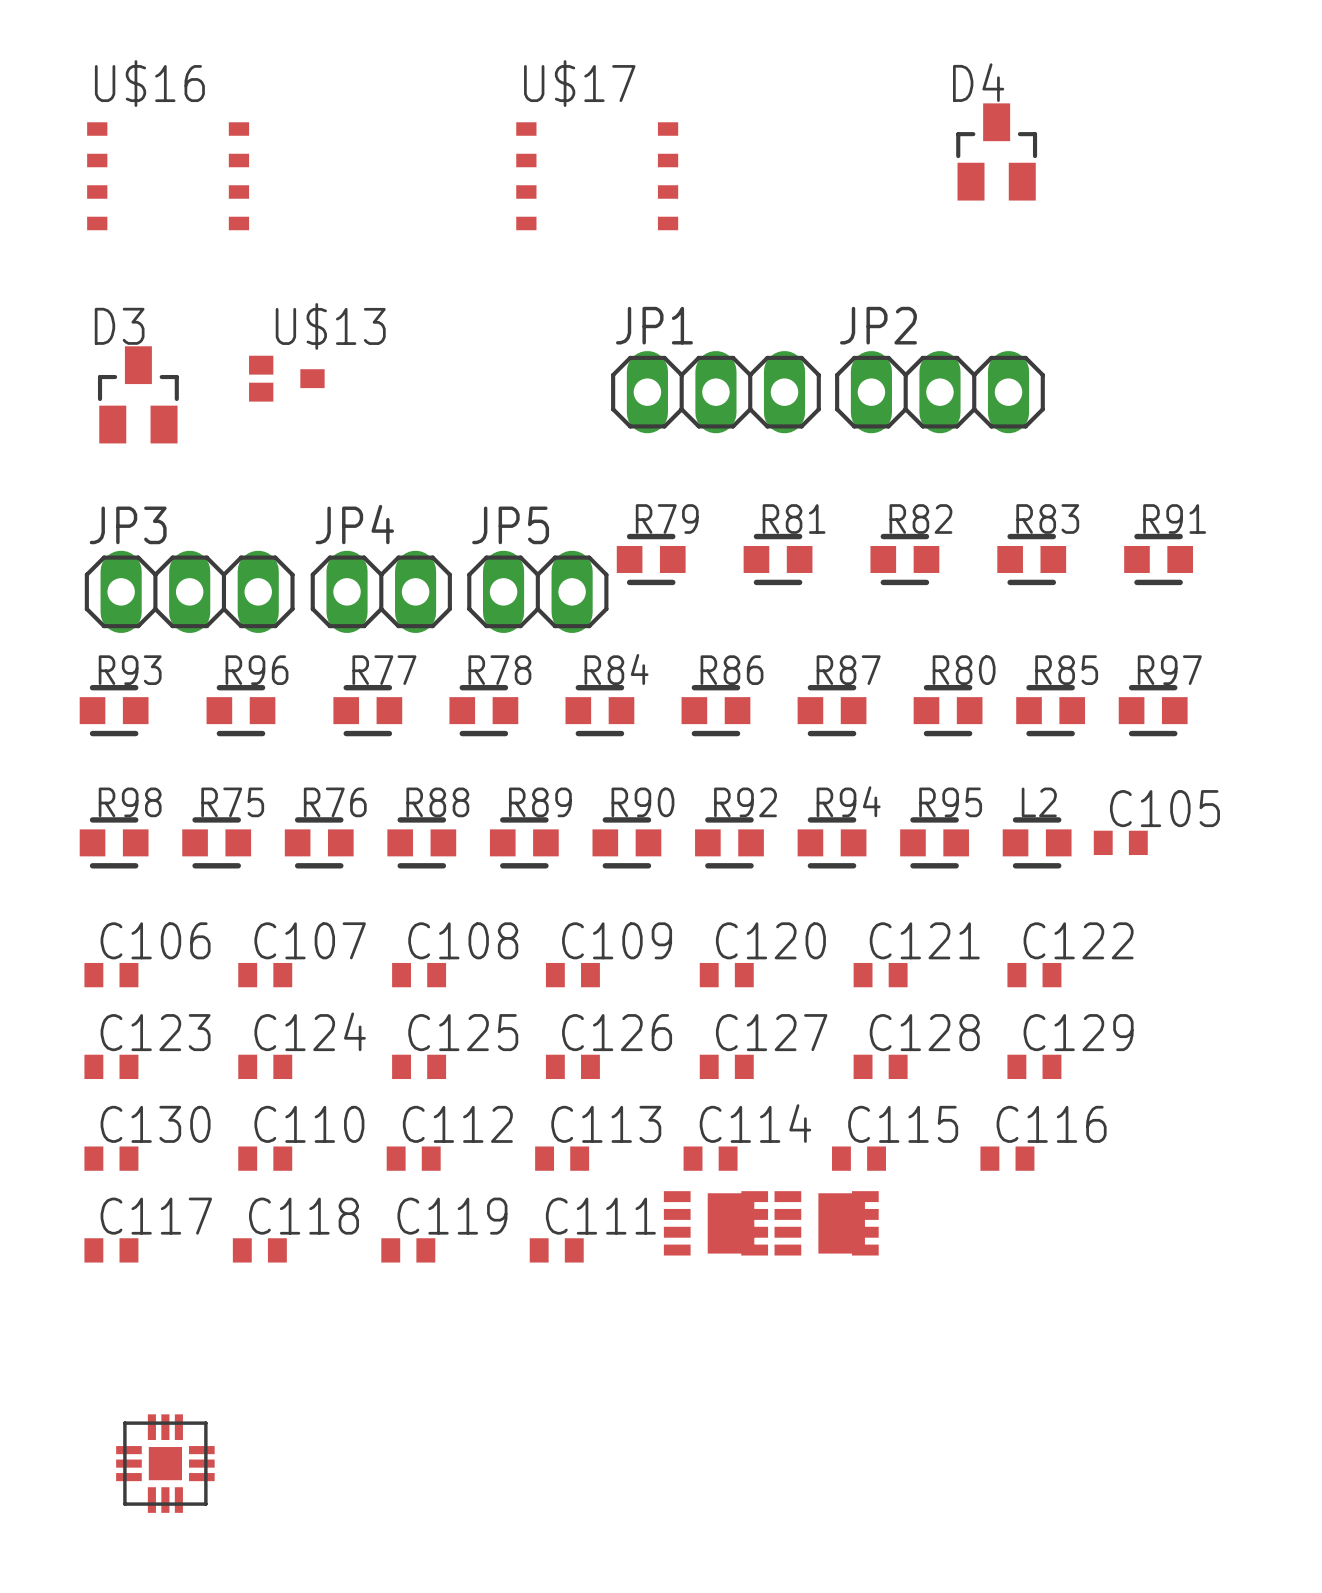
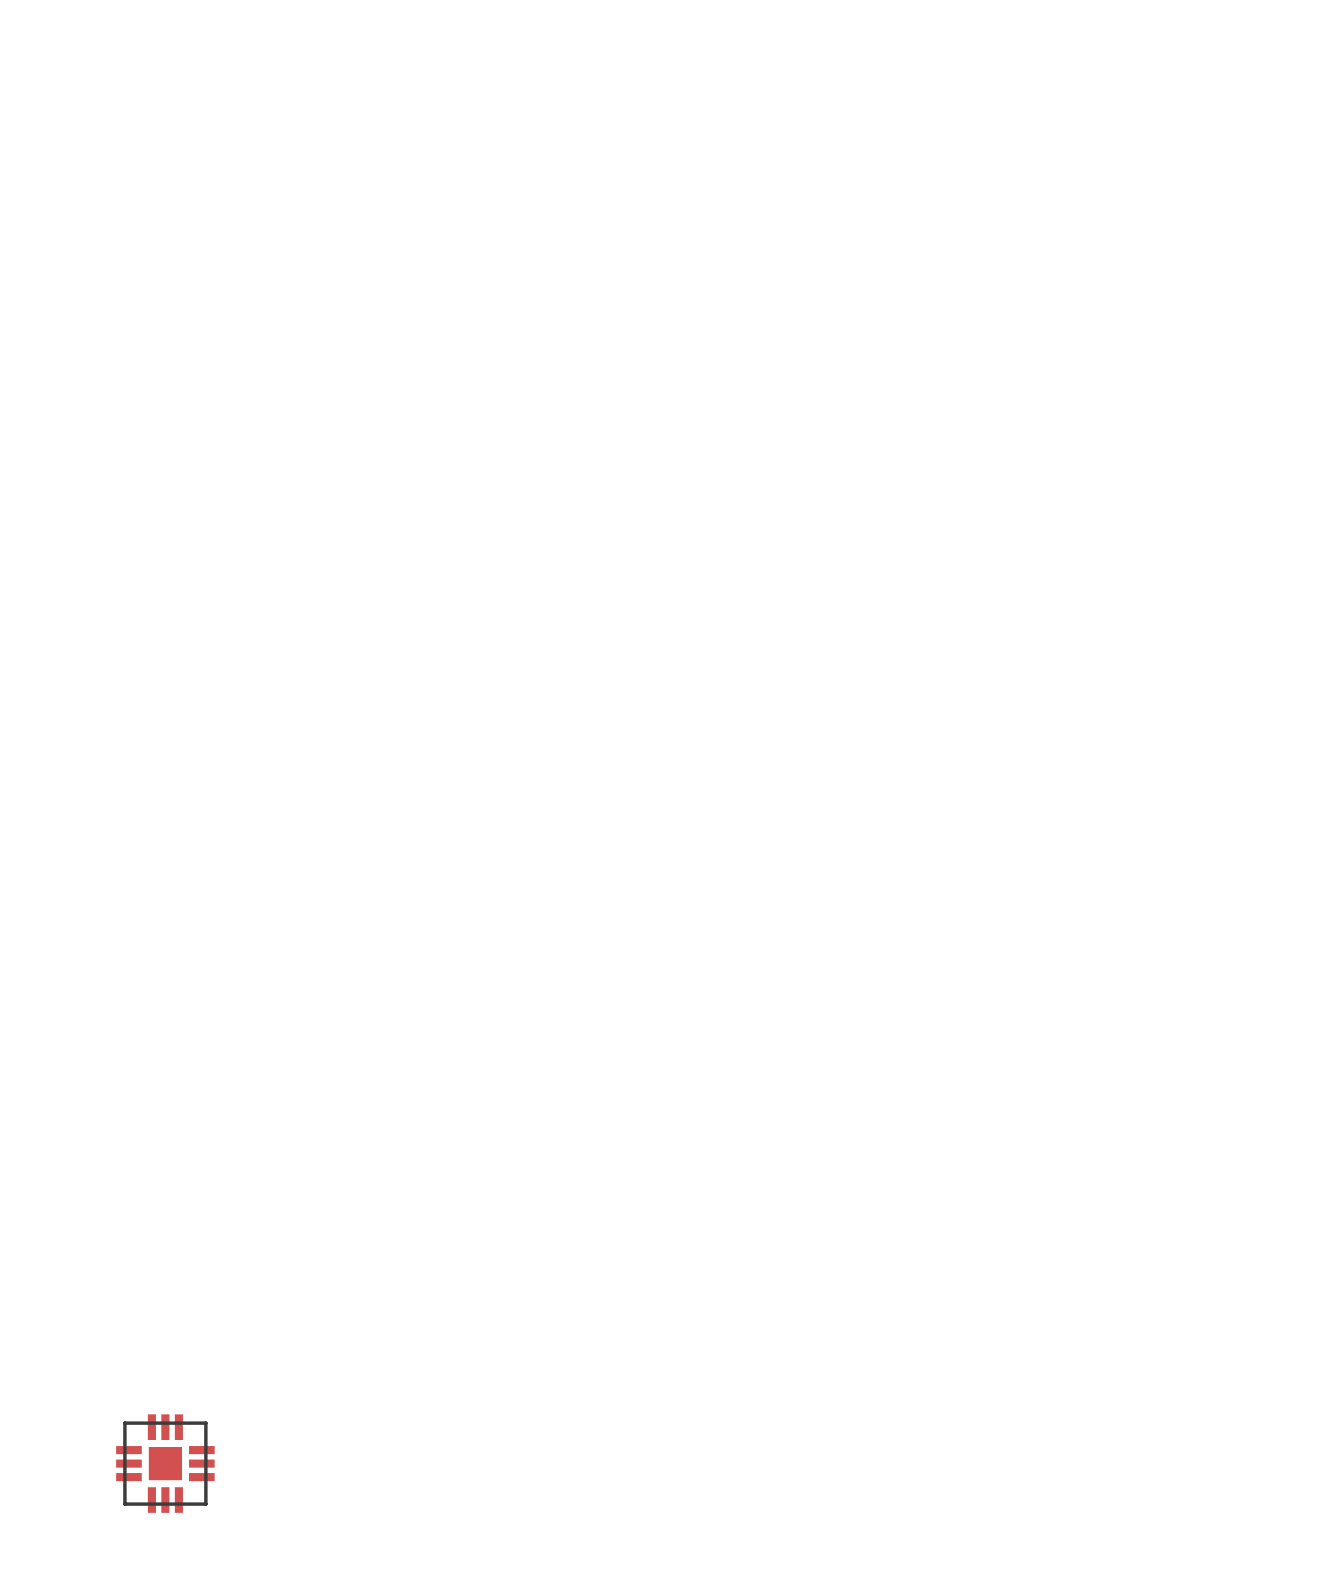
D4: (996, 151) -> none
U$16: (168, 176) -> none
U$17: (597, 176) -> none
U$13: (286, 378) -> none
JP1: (715, 392) -> none
JP2: (939, 392) -> none
D3: (138, 394) -> none
R79: (651, 559) -> none
R81: (778, 559) -> none
R82: (904, 559) -> none
R83: (1031, 559) -> none
R91: (1158, 559) -> none
JP3: (189, 591) -> none
JP4: (381, 591) -> none
JP5: (537, 591) -> none
R93: (114, 710) -> none
R96: (240, 710) -> none
R77: (367, 710) -> none
R78: (483, 710) -> none
R84: (599, 710) -> none
R86: (715, 710) -> none
R87: (832, 710) -> none
R80: (948, 710) -> none
R85: (1050, 710) -> none
R97: (1153, 710) -> none
R98: (114, 842) -> none
R75: (216, 842) -> none
R76: (319, 842) -> none
R88: (421, 842) -> none
R89: (524, 842) -> none
R90: (626, 842) -> none
R92: (729, 842) -> none
R94: (832, 842) -> none
R95: (934, 842) -> none
L2: (1037, 842) -> none
C105: (1120, 842) -> none
C106: (111, 975) -> none
C107: (265, 975) -> none
C108: (419, 975) -> none
C109: (572, 975) -> none
C120: (726, 975) -> none
C121: (880, 975) -> none
C122: (1034, 975) -> none
C123: (111, 1066) -> none
C124: (265, 1066) -> none
C125: (419, 1066) -> none
C126: (572, 1066) -> none
C127: (726, 1066) -> none
C128: (880, 1066) -> none
C129: (1034, 1066) -> none
C130: (111, 1158) -> none
C110: (265, 1158) -> none
C112: (413, 1158) -> none
C113: (562, 1158) -> none
C114: (710, 1158) -> none
C115: (859, 1158) -> none
C116: (1007, 1158) -> none
part: (715, 1223) -> none
part: (826, 1223) -> none
C117: (111, 1250) -> none
C118: (259, 1250) -> none
C119: (408, 1250) -> none
C111: (556, 1250) -> none

